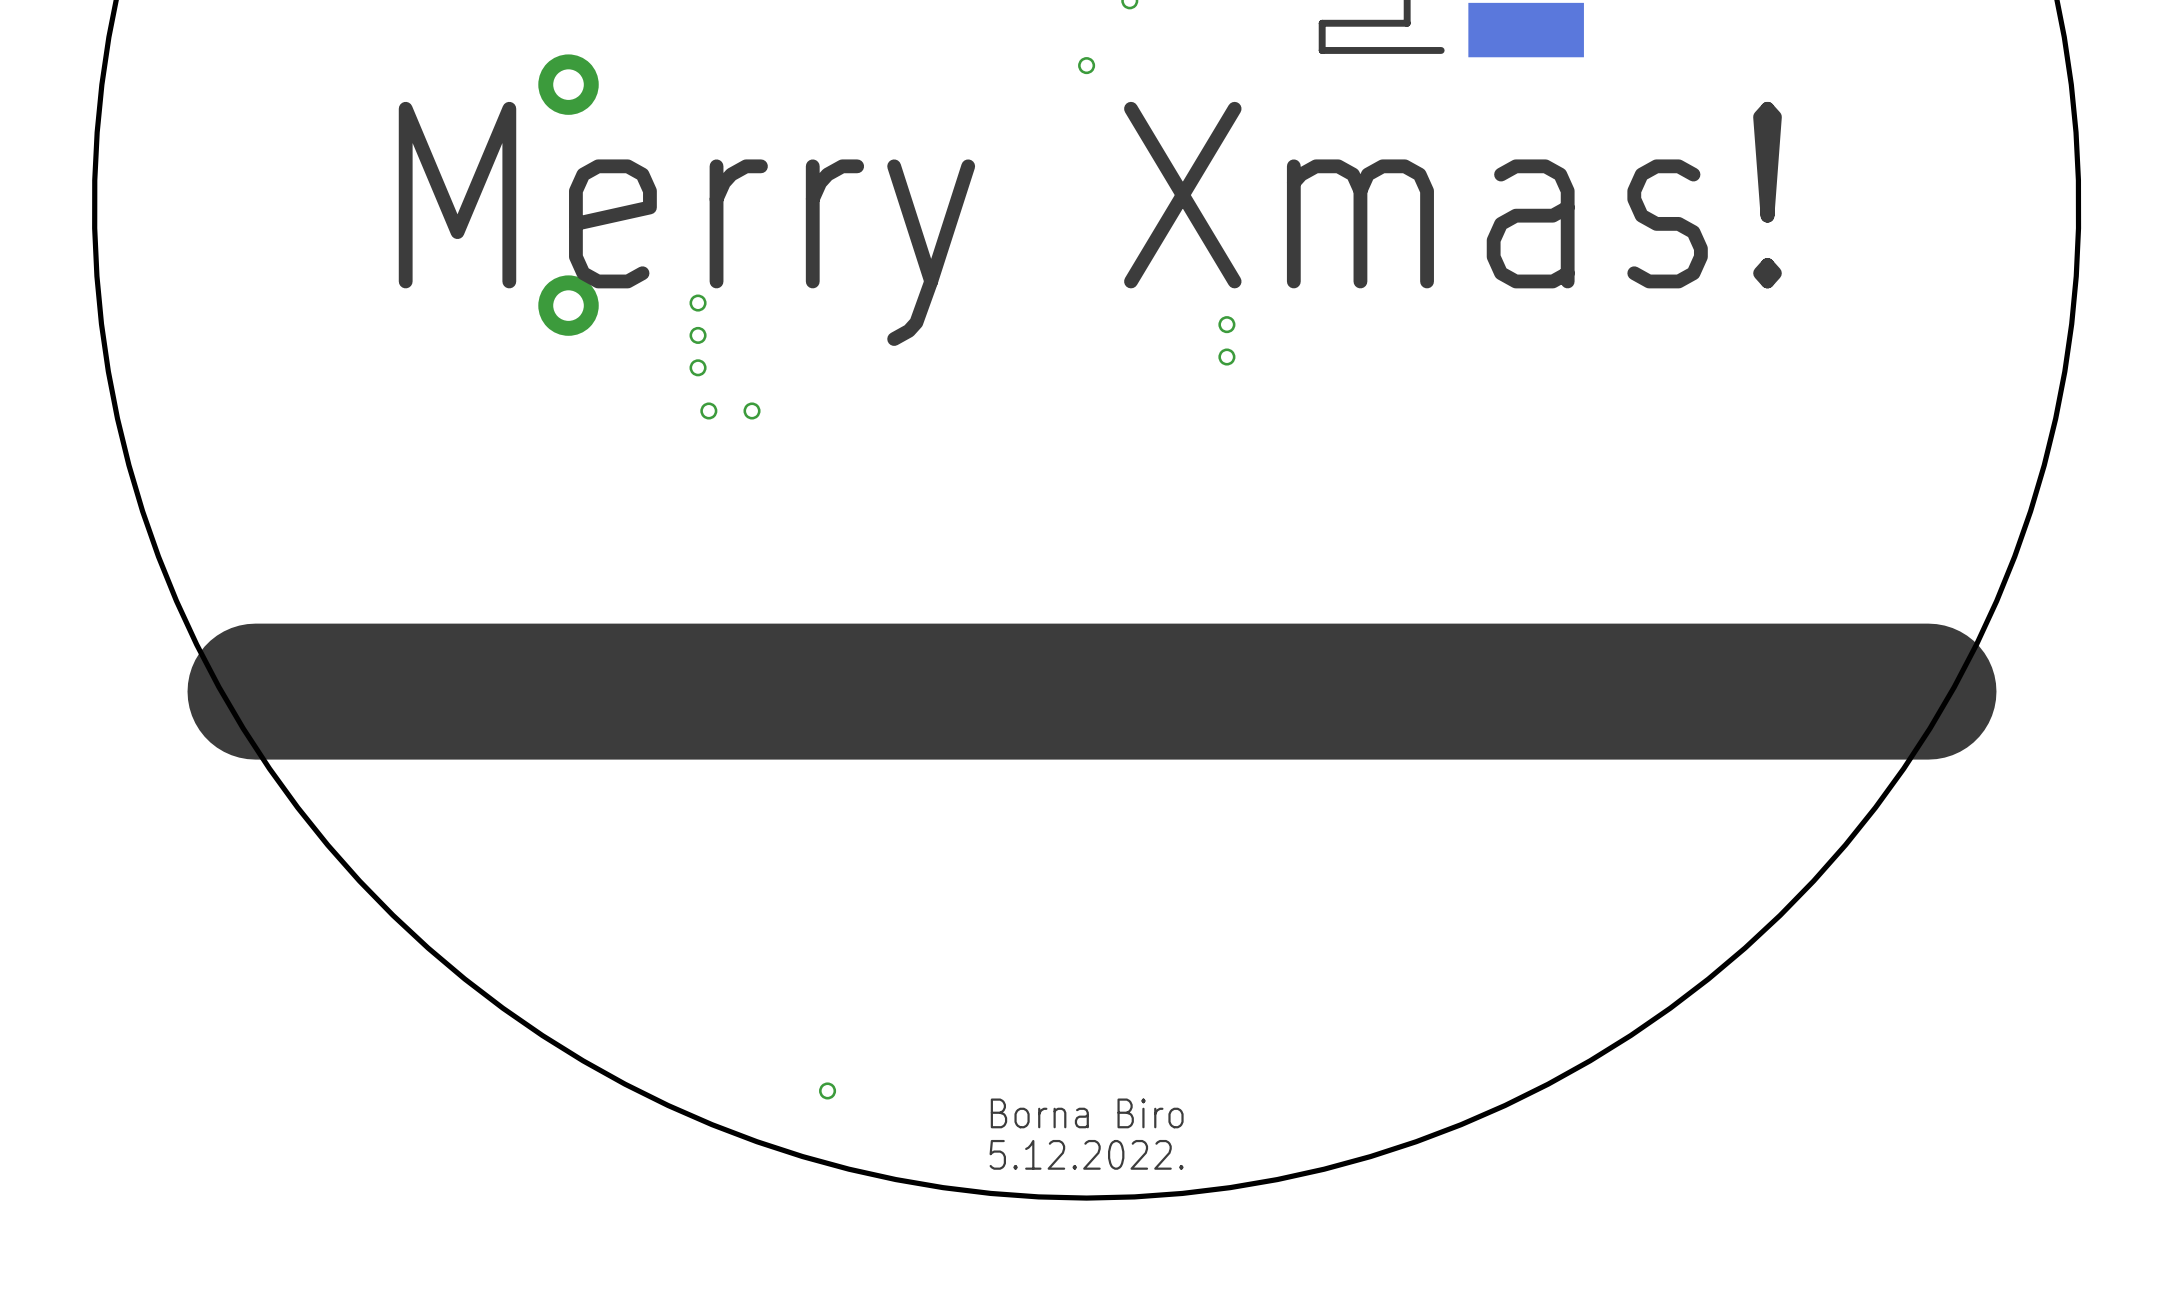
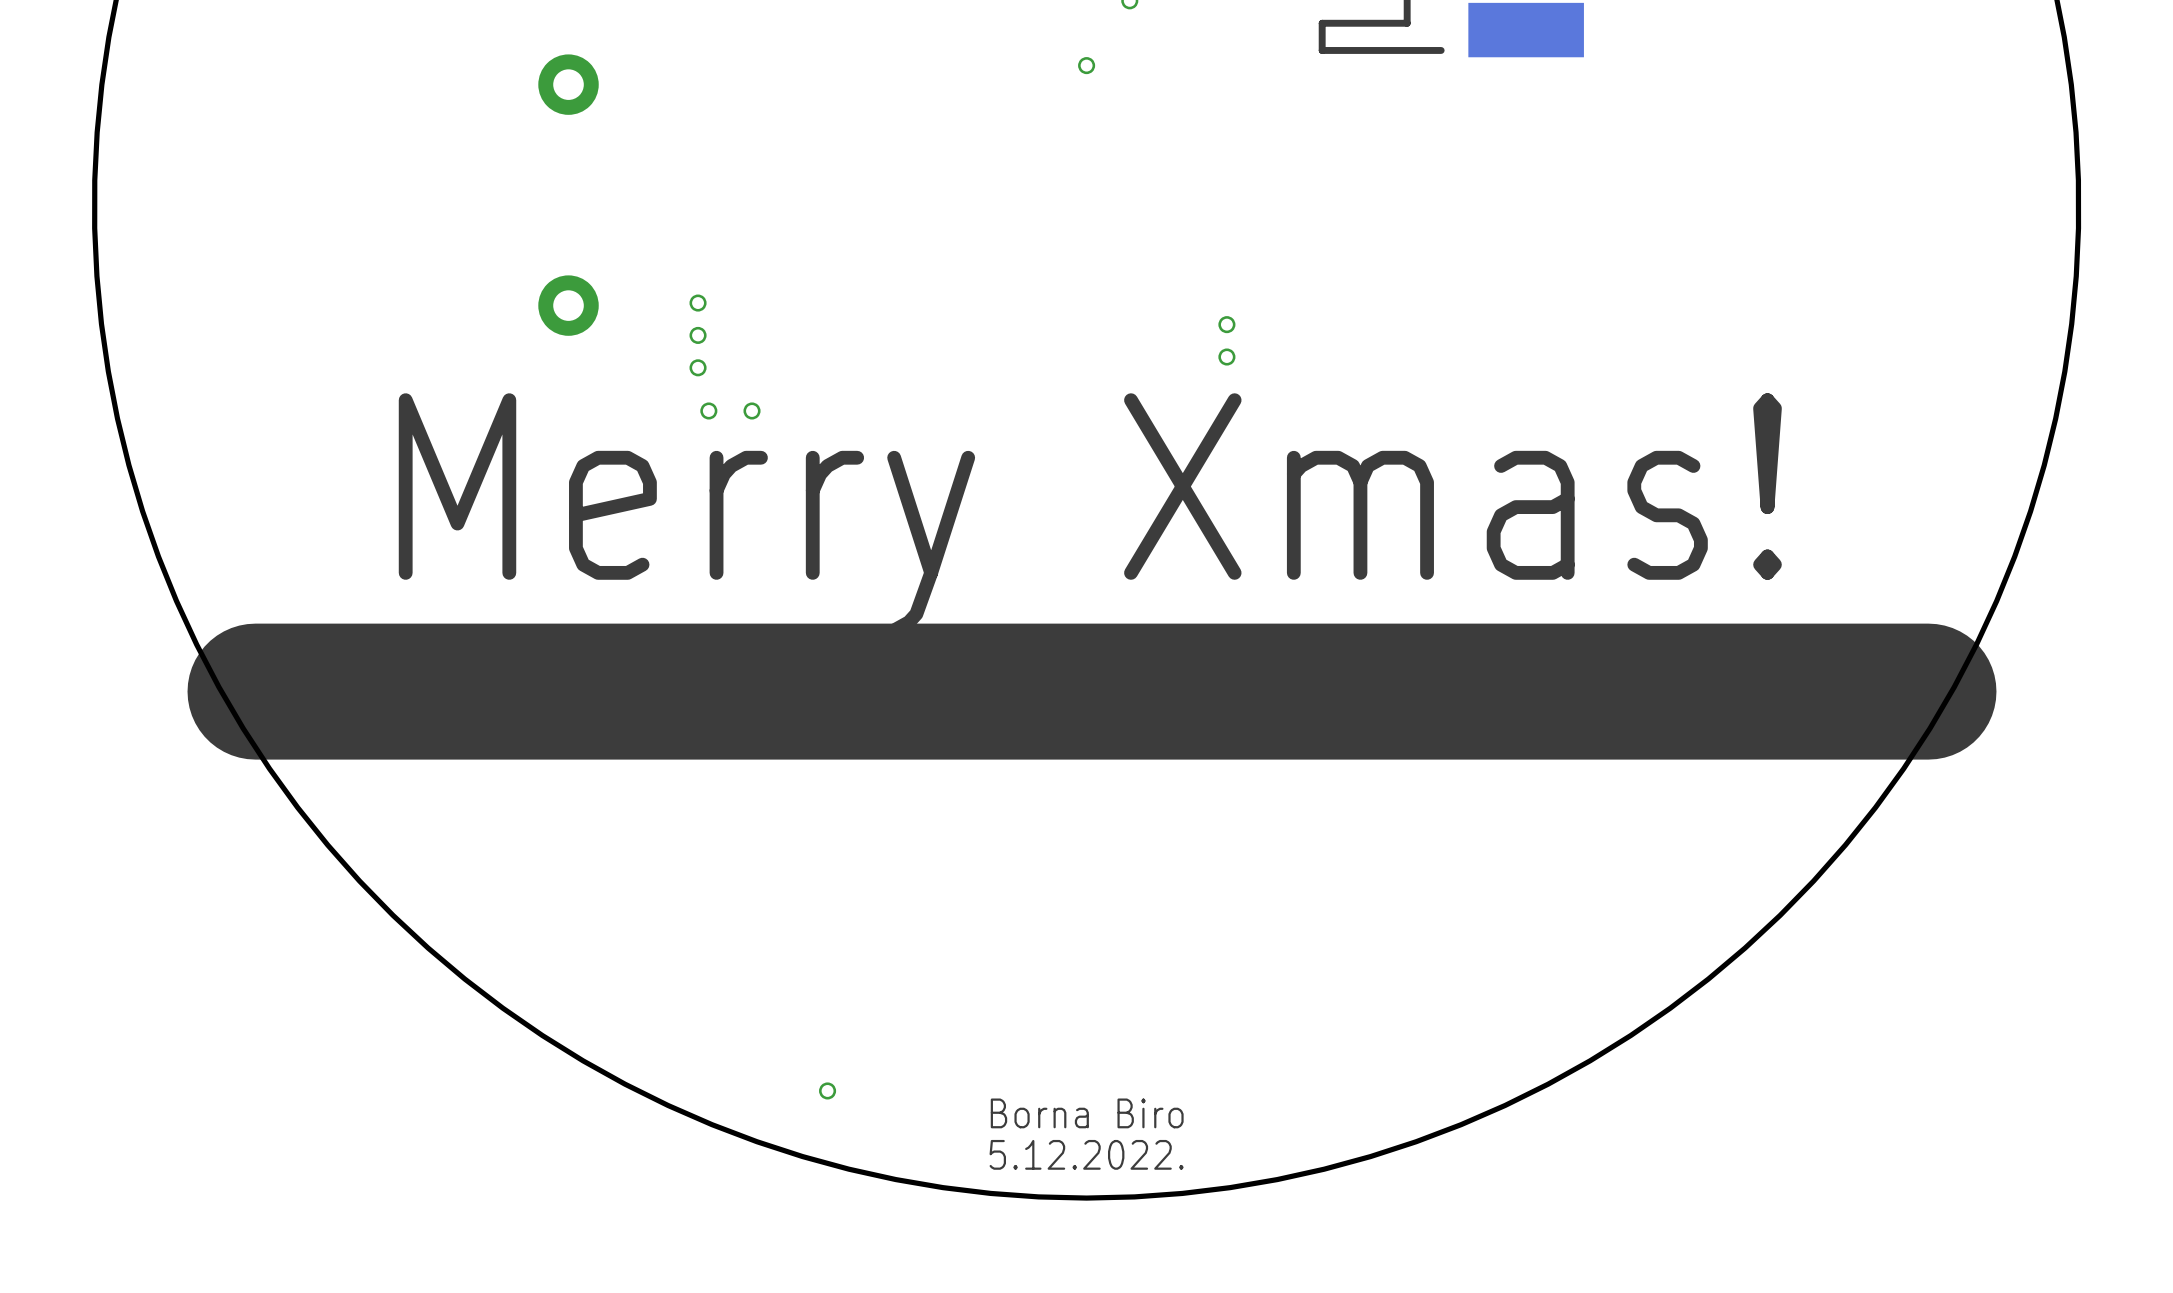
text position: Merry Xmas! (1090, 223) -> Merry Xmas! (1090, 515)

